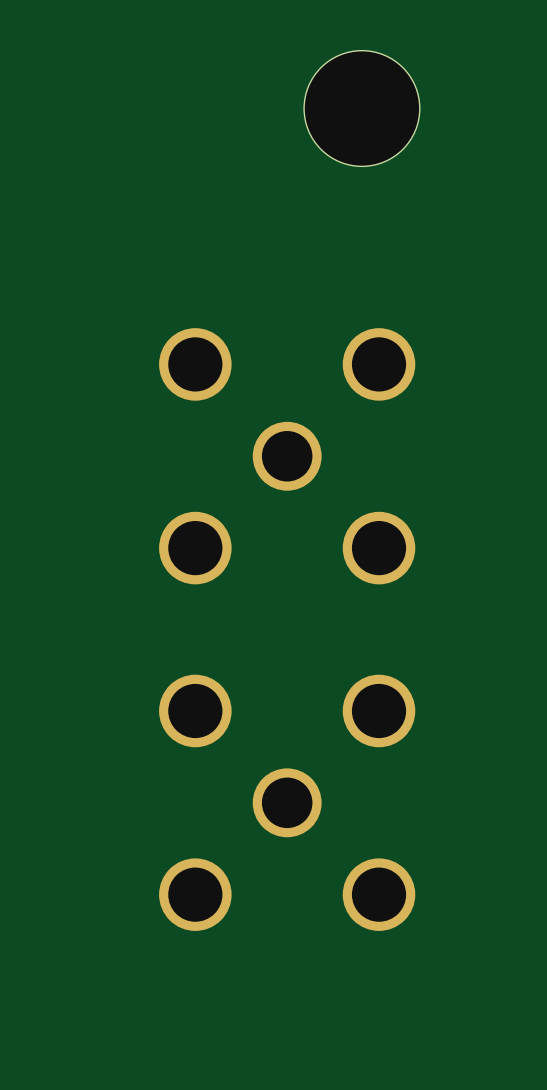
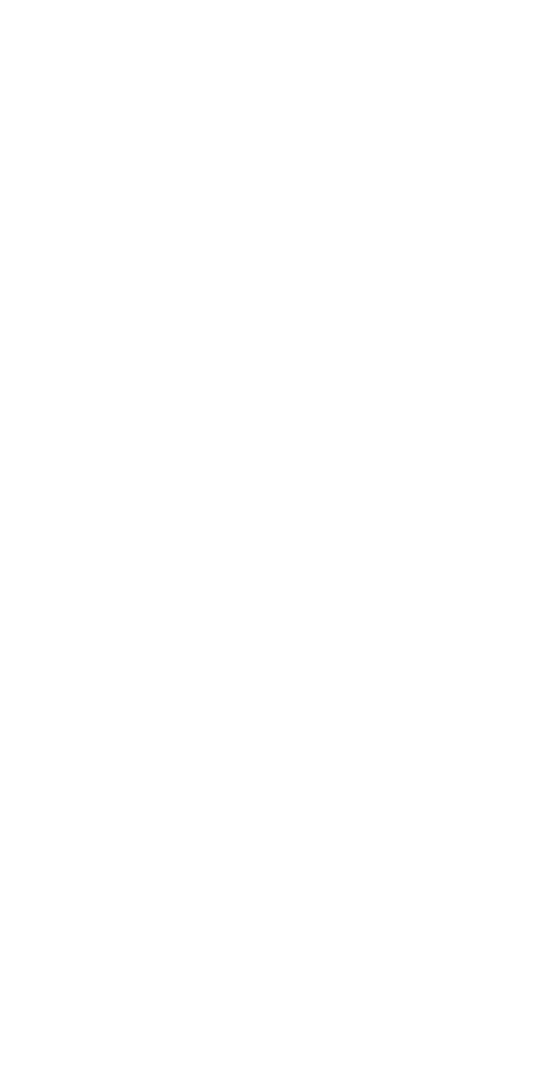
part: (361, 108) -> none
part: (287, 456) -> none
part: (287, 802) -> none

